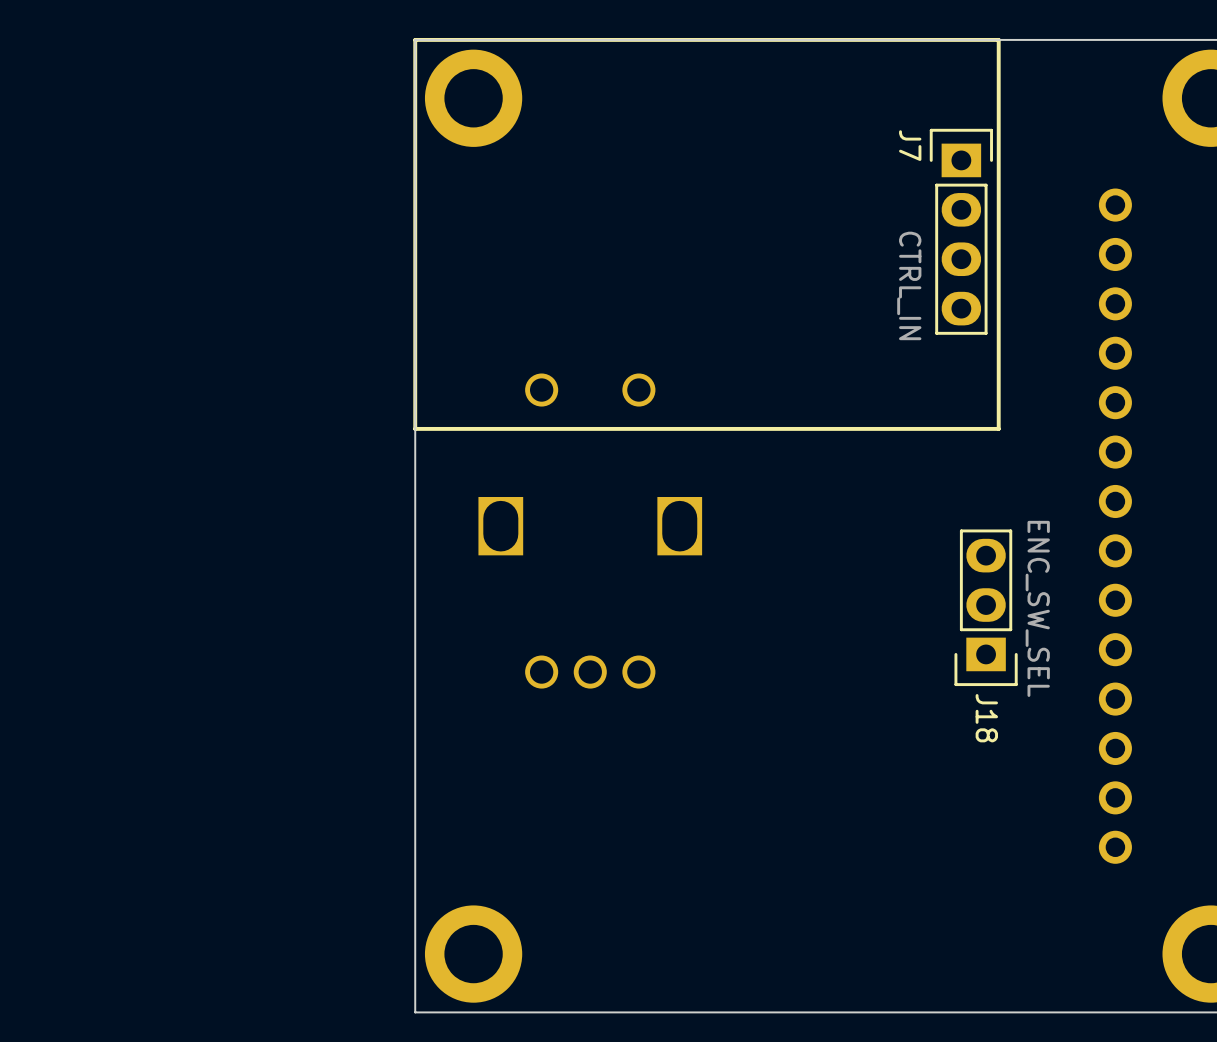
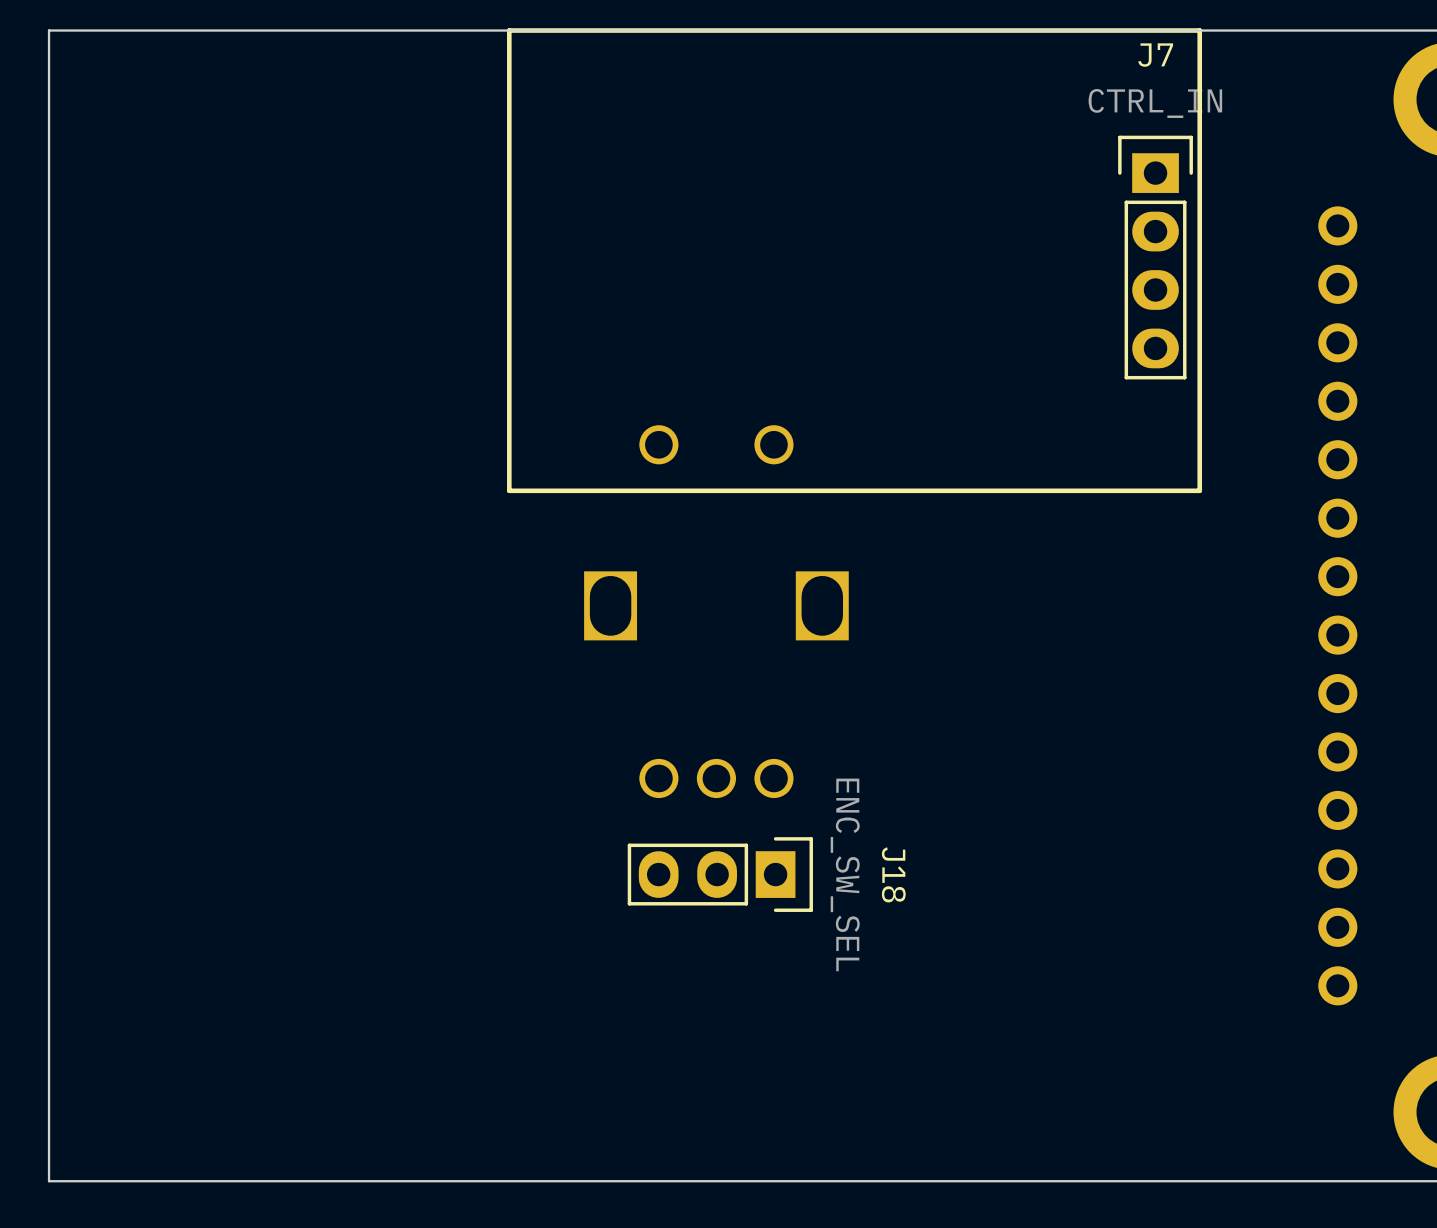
board edge: (415, 39) (415, 1012) -> (509, 30) (49, 30) (49, 1181) (509, 1181)
part: (473, 98) -> none
J7 name rotation: 0° (910, 145) -> 90° counterclockwise (1155, 55)
J7 name position: J7 (910, 145) -> J7 (1155, 55)
J7 value rotation: 0° (909, 285) -> 90° counterclockwise (1155, 103)
J7 value position: CTRL_IN (909, 285) -> CTRL_IN (1155, 103)
J18 rotation: 0° (986, 607) -> 90° counterclockwise (720, 874)
J18 position: (986, 607) -> (720, 874)
J18 value position: ENC_SW_SEL (1037, 608) -> ENC_SW_SEL (845, 874)
part: (473, 954) -> none

